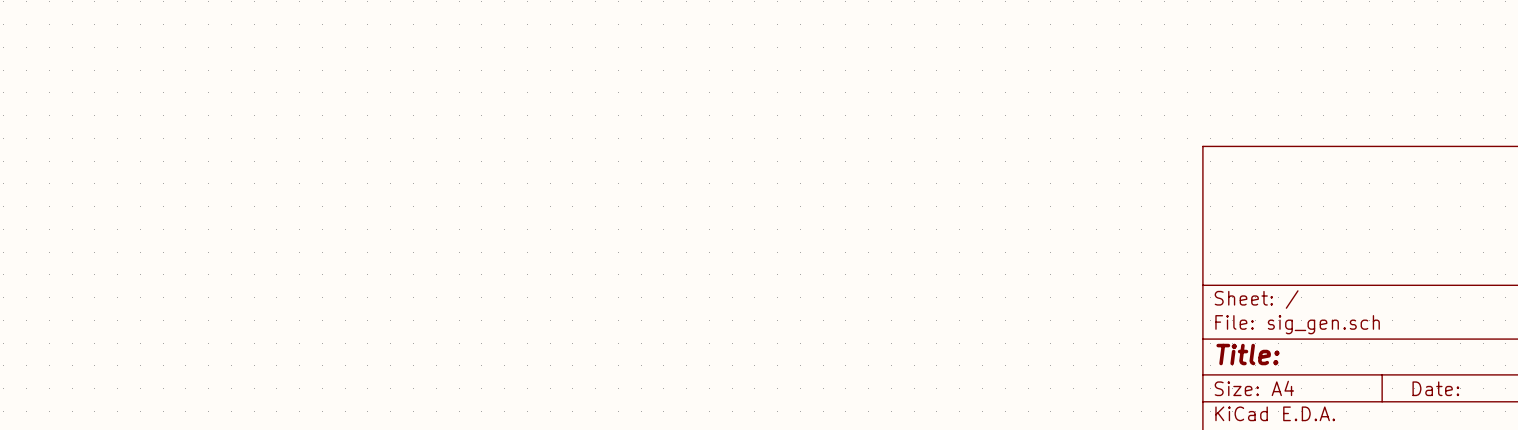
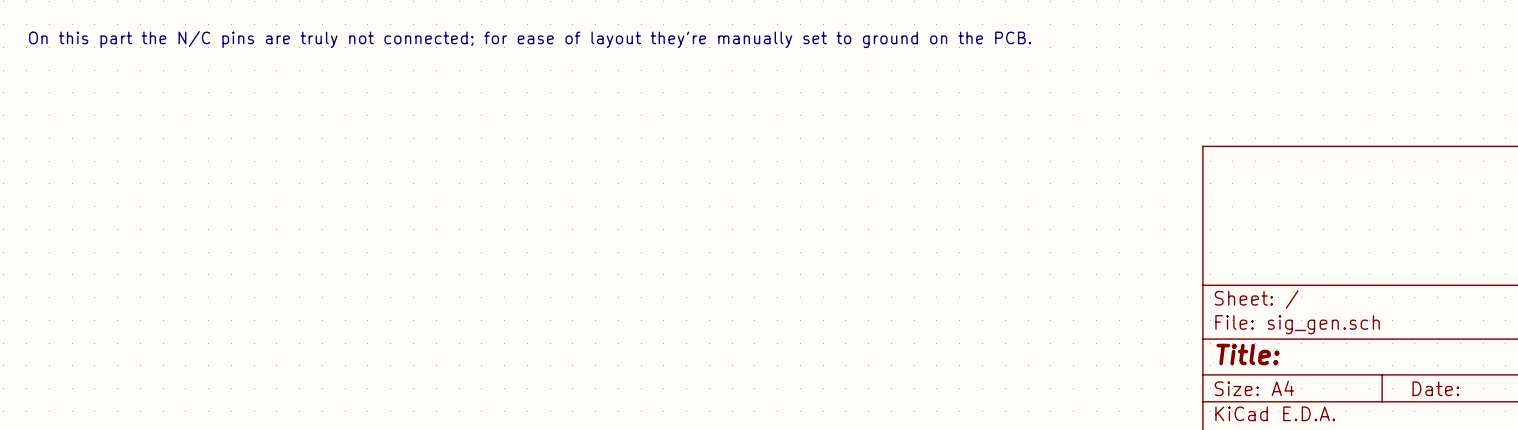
text: none -> On this part the N/C pins are truly not connected; for ease of layout they're manually set to ground on the PCB. (530, 39)

